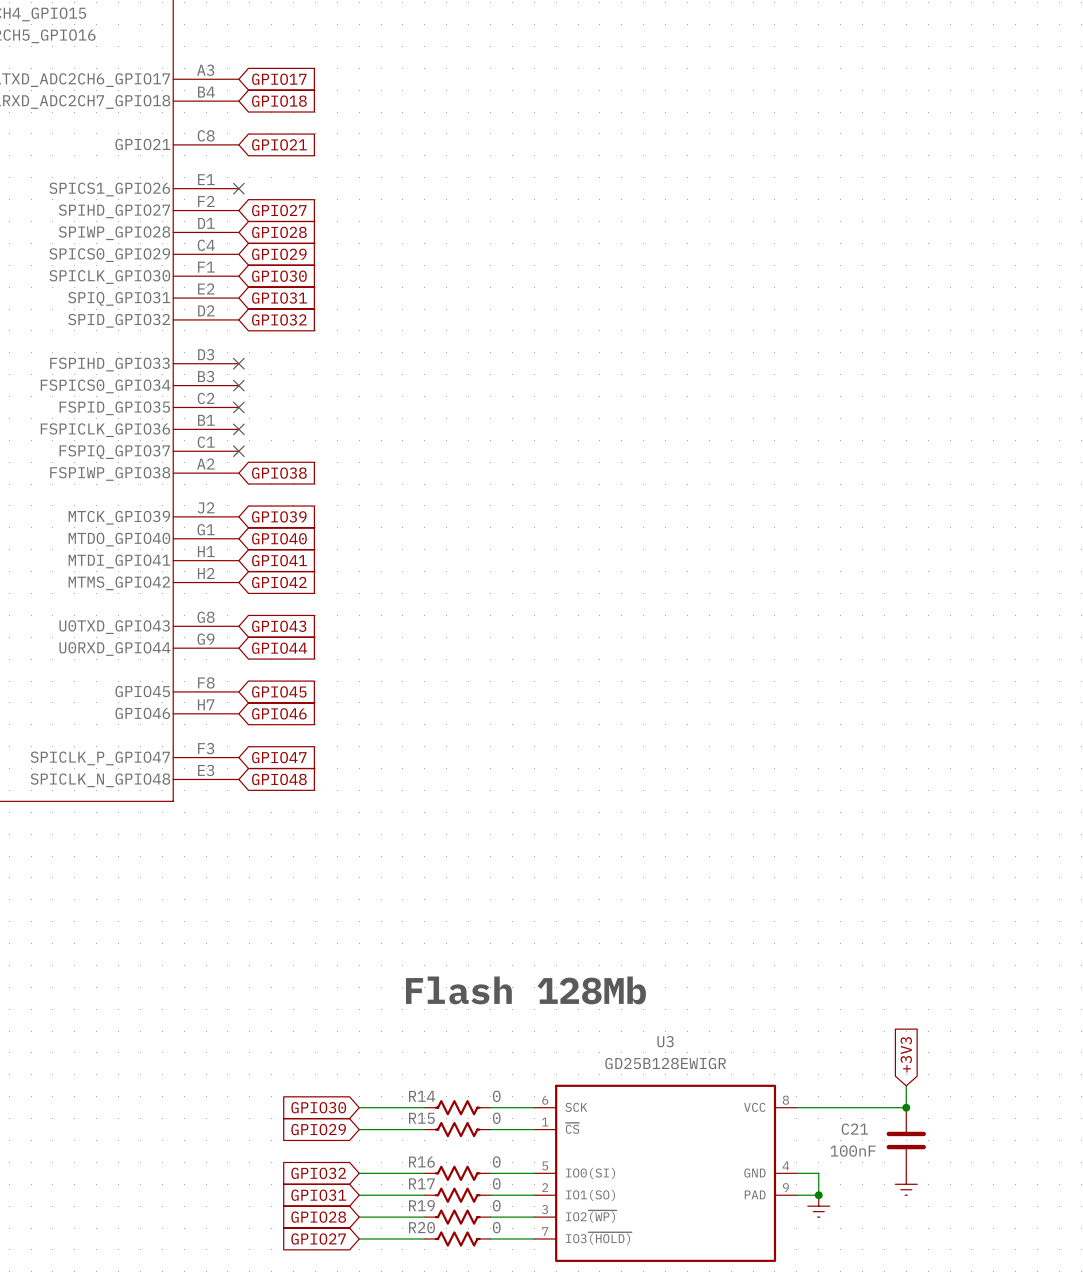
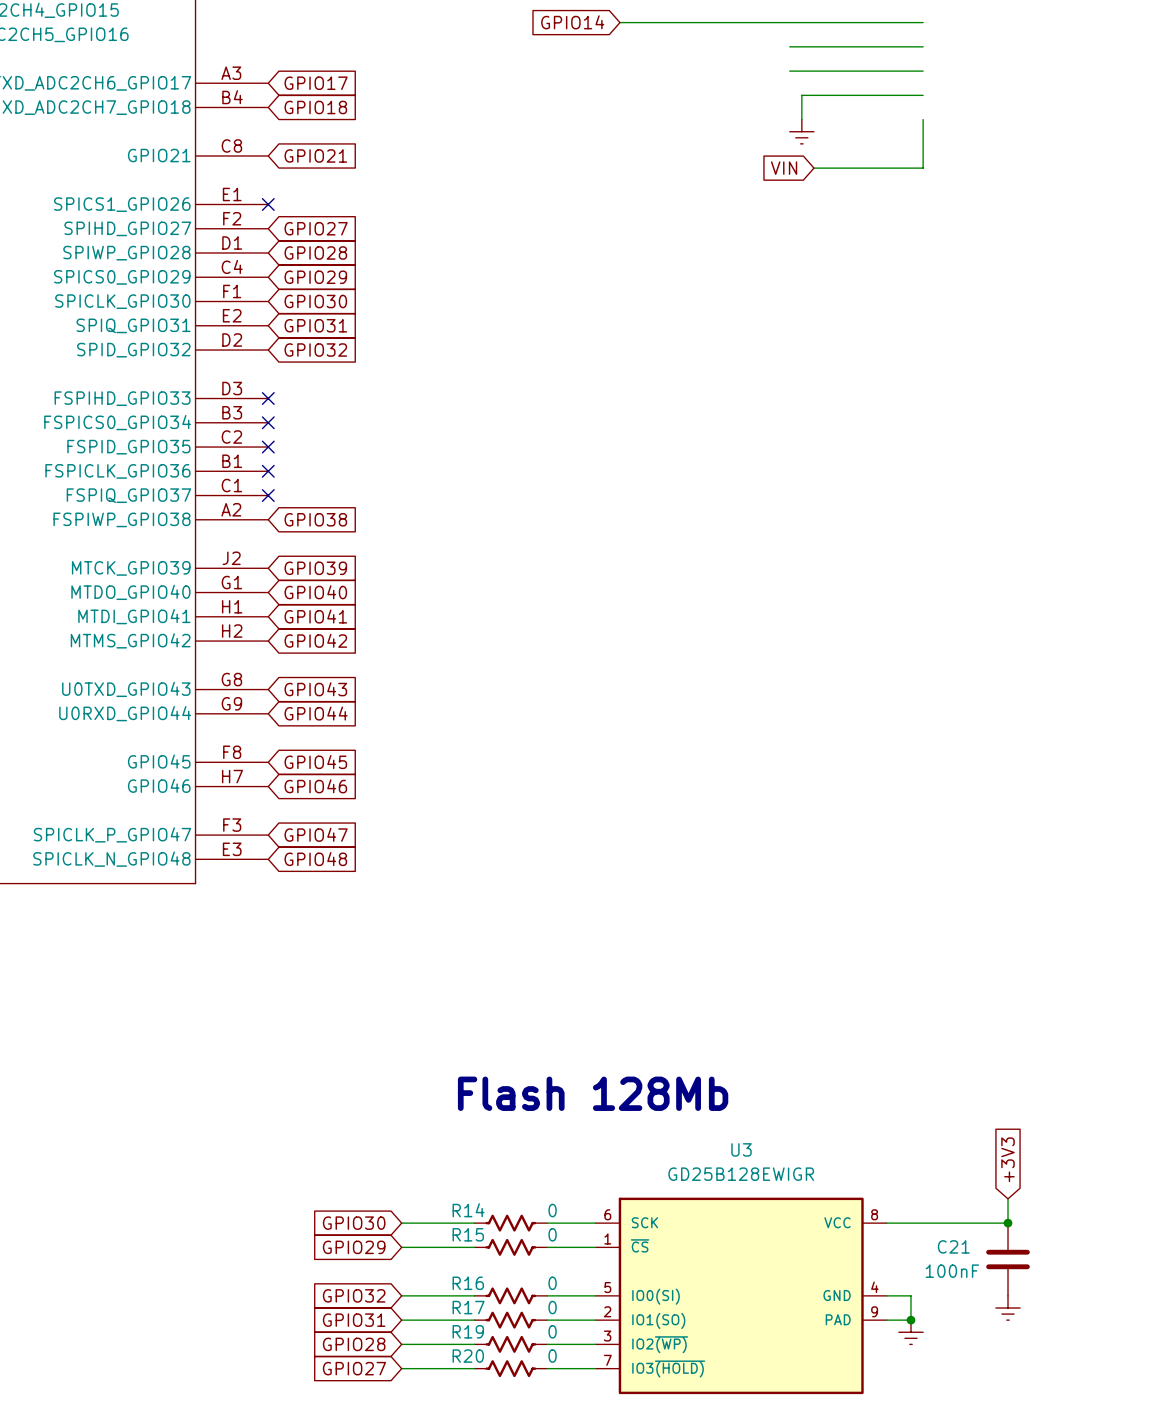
global label: none -> GPIO14 (572, 22)
wire: none -> (619, 22) (923, 22)
wire: none -> (789, 46) (923, 46)
wire: none -> (789, 71) (923, 71)
wire: none -> (923, 95) (801, 95) (801, 119)
wire: none -> (923, 119) (923, 168) (813, 168)
power symbol: none -> (801, 131)
global label: none -> VIN (784, 168)

